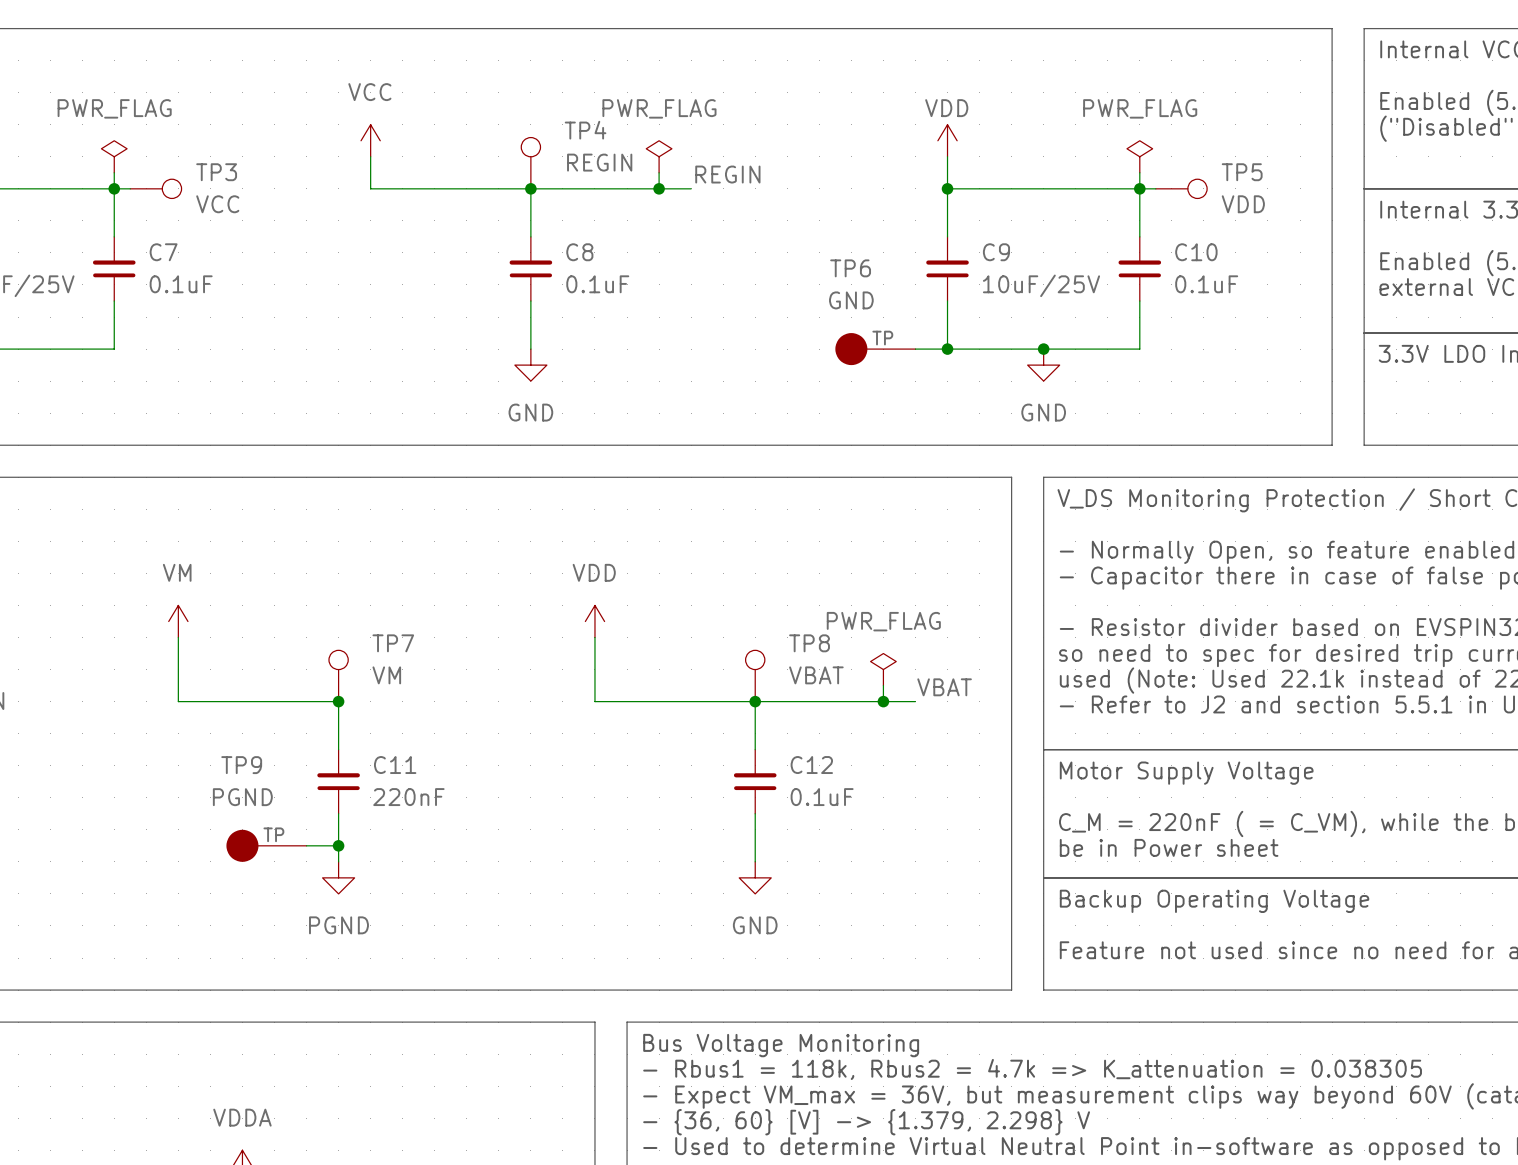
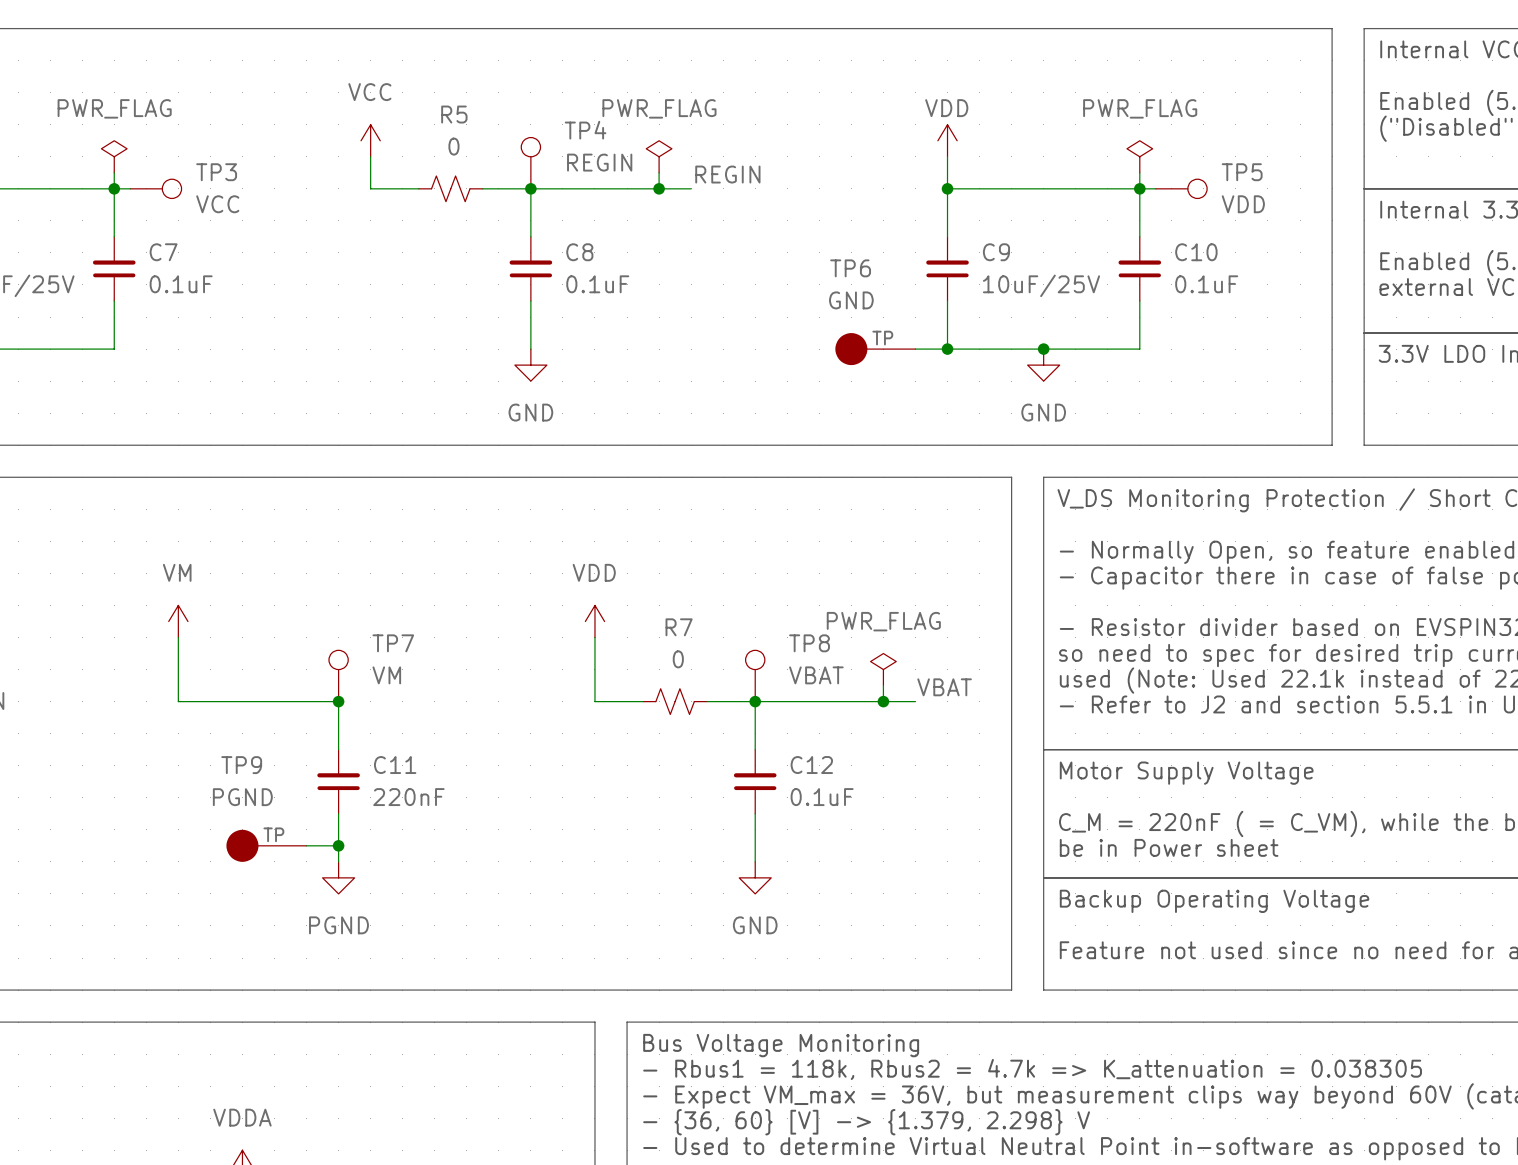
wire: (418, 188) (482, 188) -> none
R5: none -> 0 (450, 188)
wire: (643, 701) (707, 701) -> none
R7: none -> 0 (675, 701)

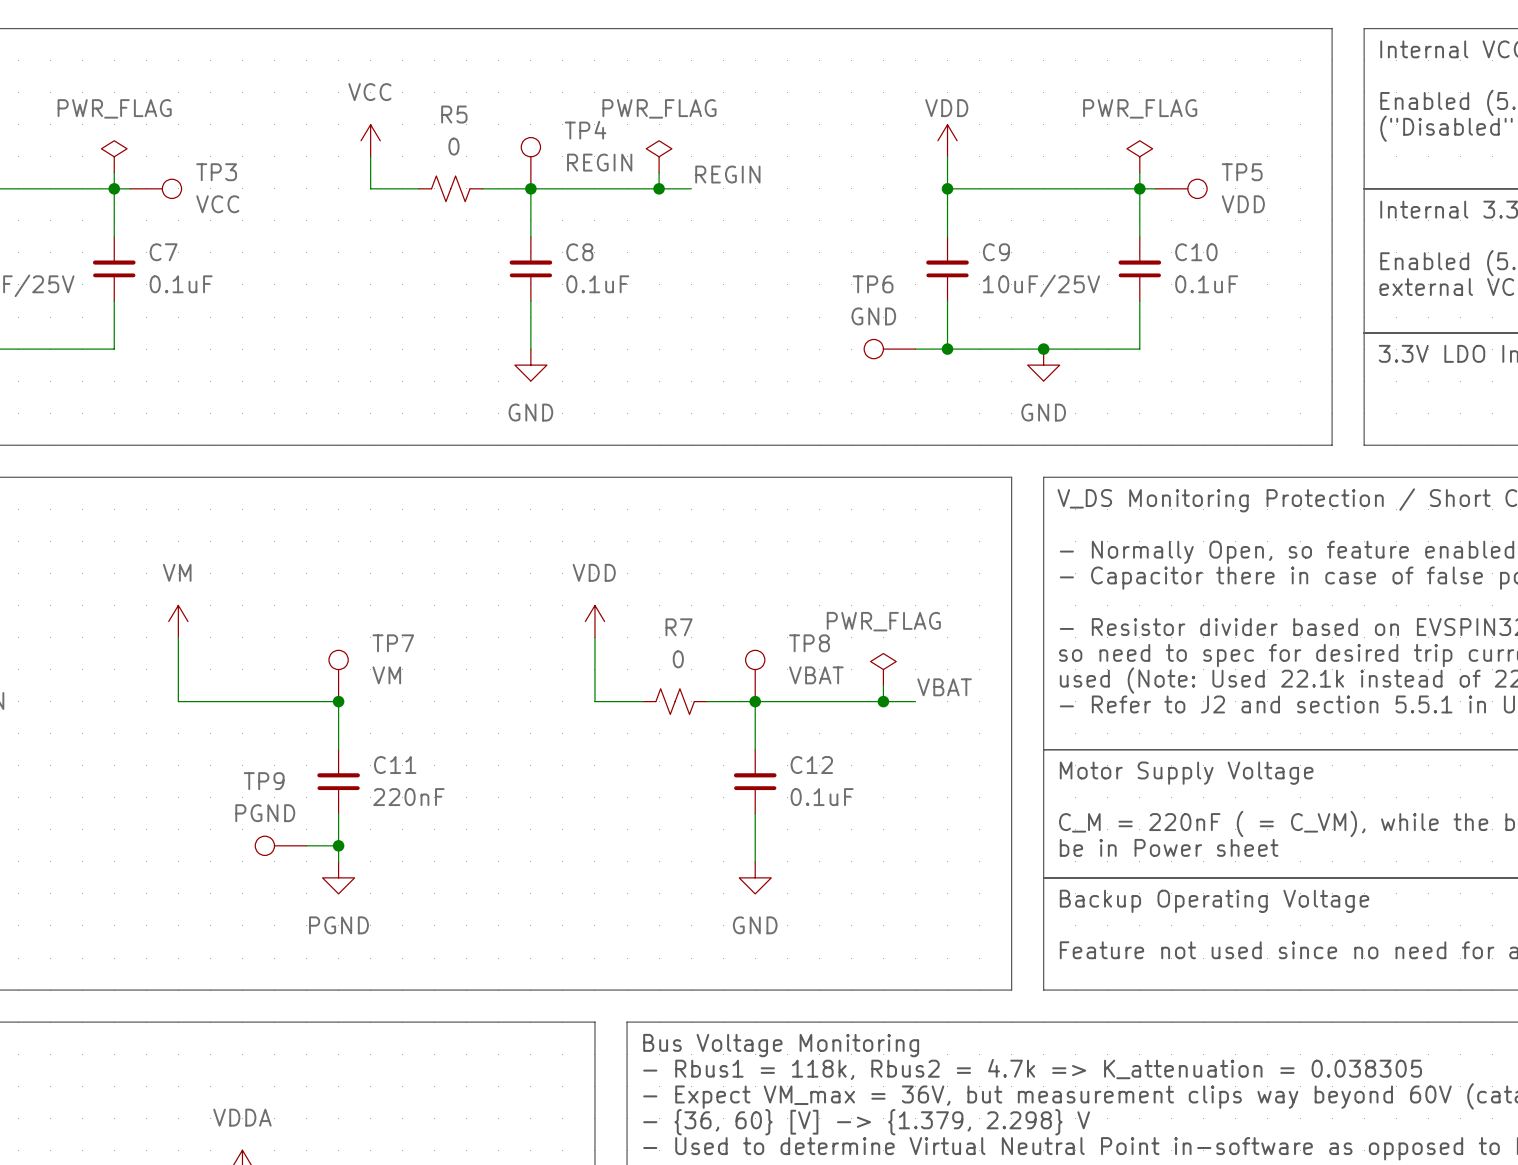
TP6 symbol: [835, 333, 916, 366] -> [864, 339, 916, 359]
TP9 symbol: [226, 829, 307, 862] -> [255, 836, 307, 856]

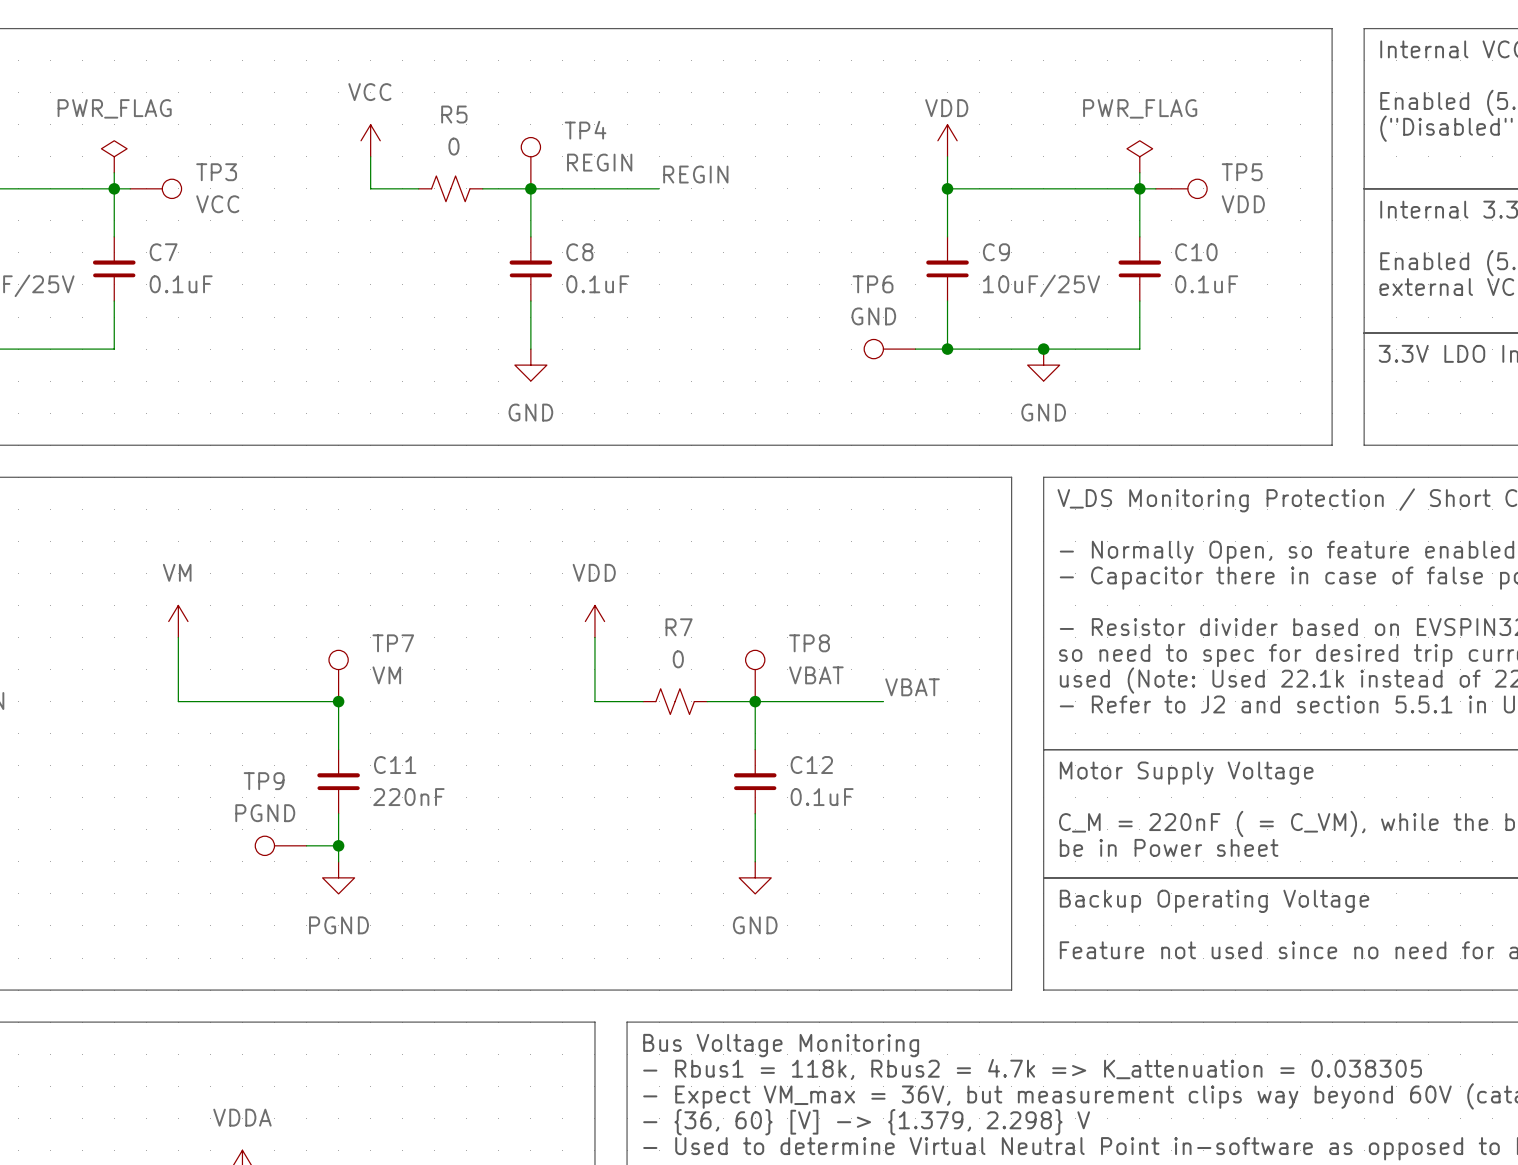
power symbol: PWR_FLAG (659, 156) -> none
wire: (659, 172) (659, 188) (691, 188) -> none
label position: REGIN (727, 174) -> REGIN (695, 174)
junction: (659, 188) -> none
power symbol: PWR_FLAG (883, 669) -> none
wire: (883, 685) (883, 701) (915, 701) -> none
label position: VBAT (944, 687) -> VBAT (912, 687)
junction: (883, 701) -> none

